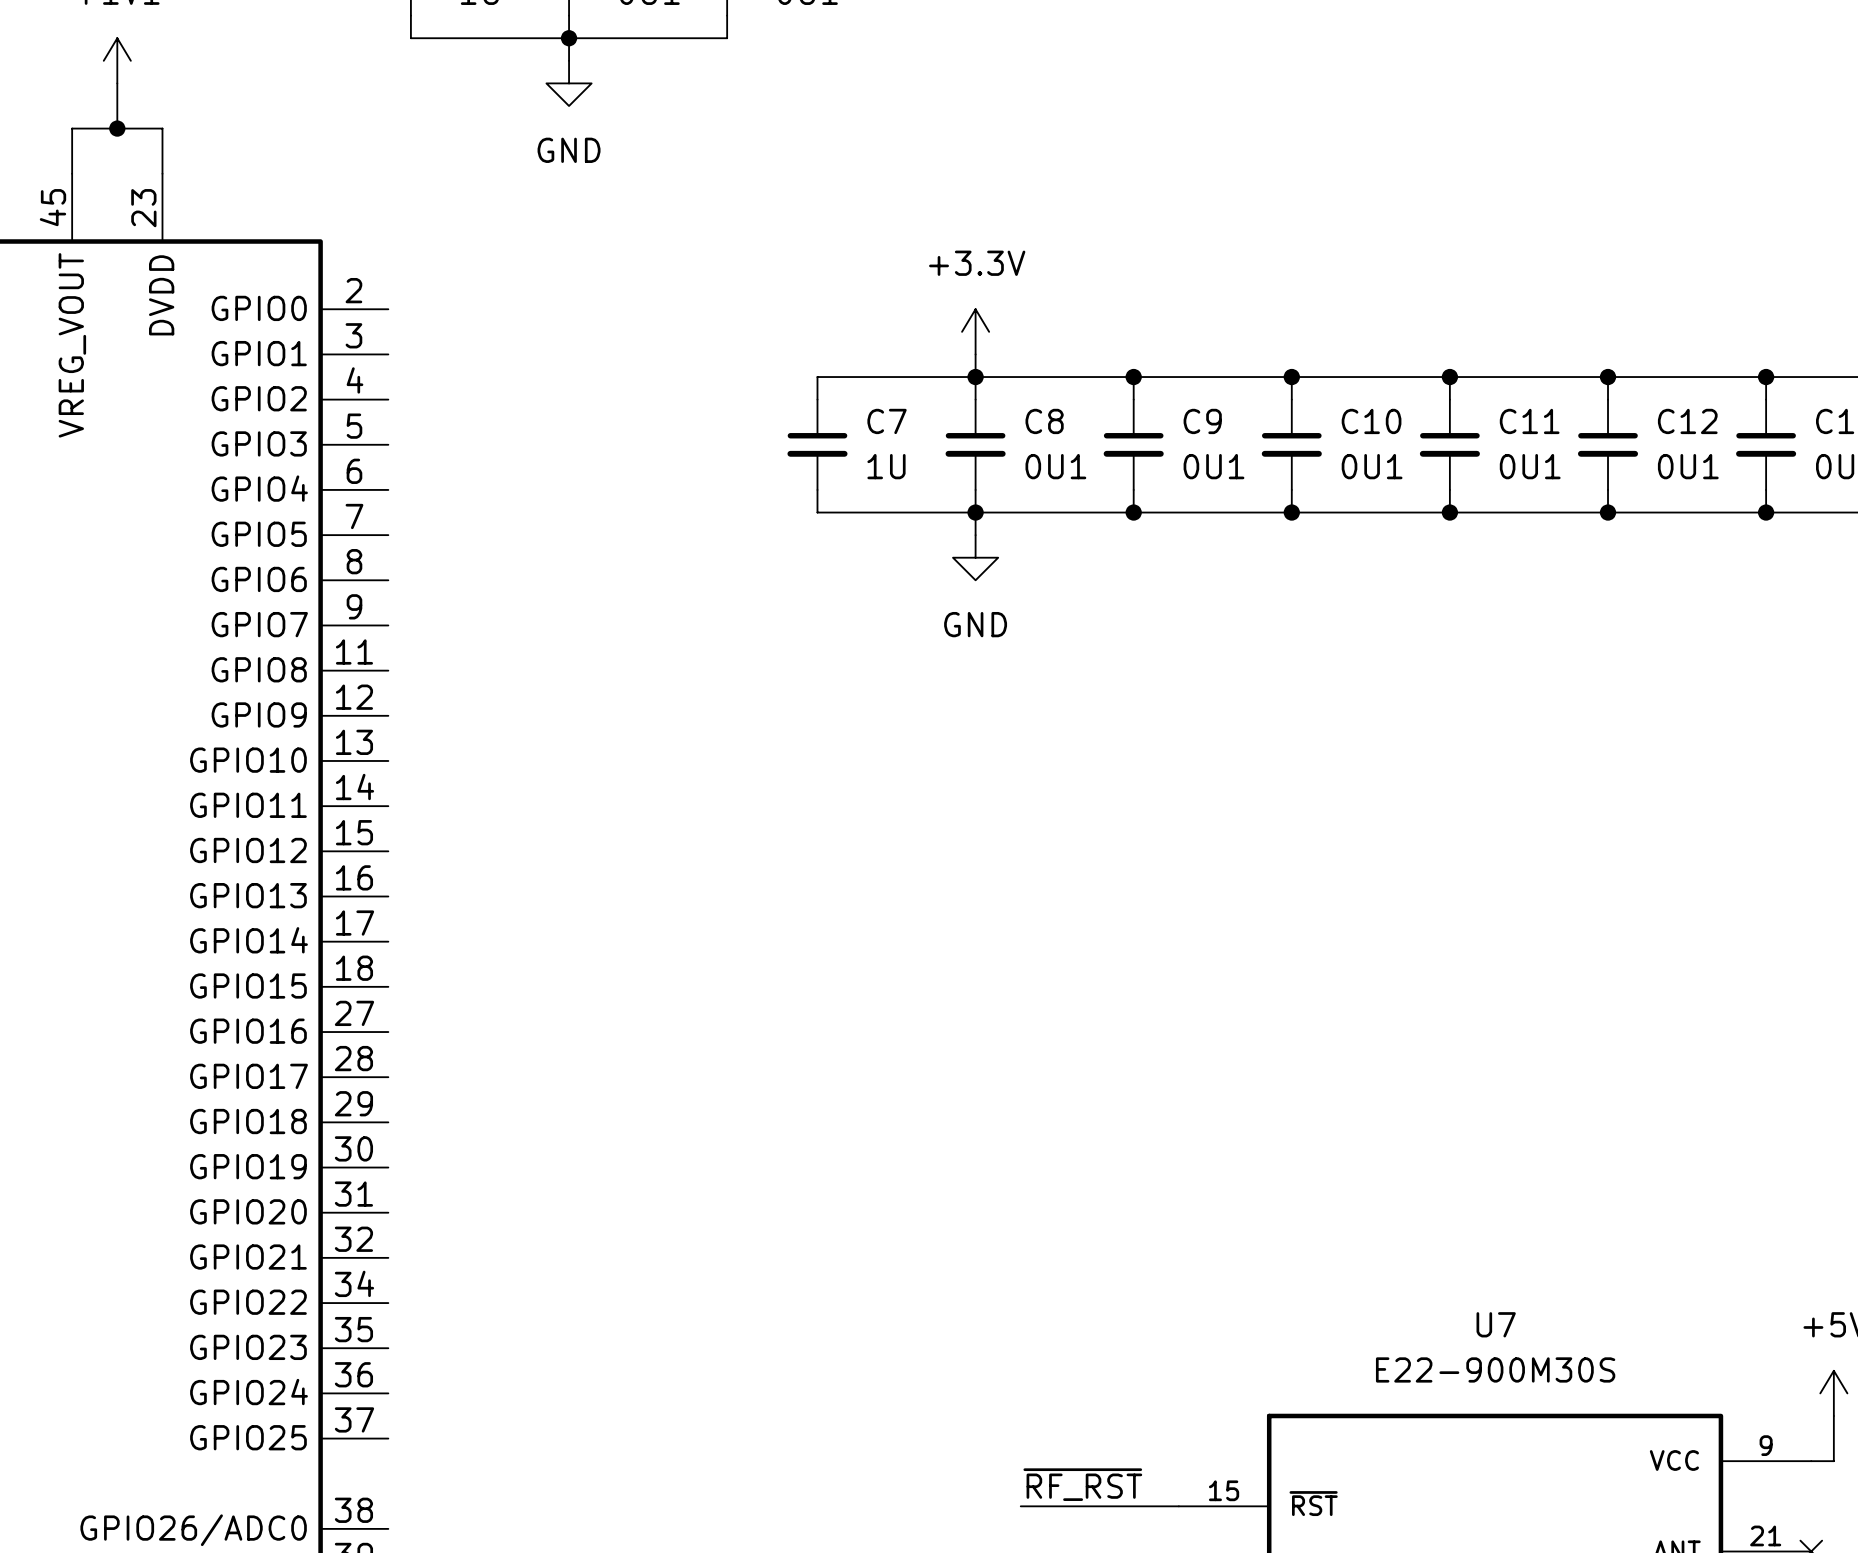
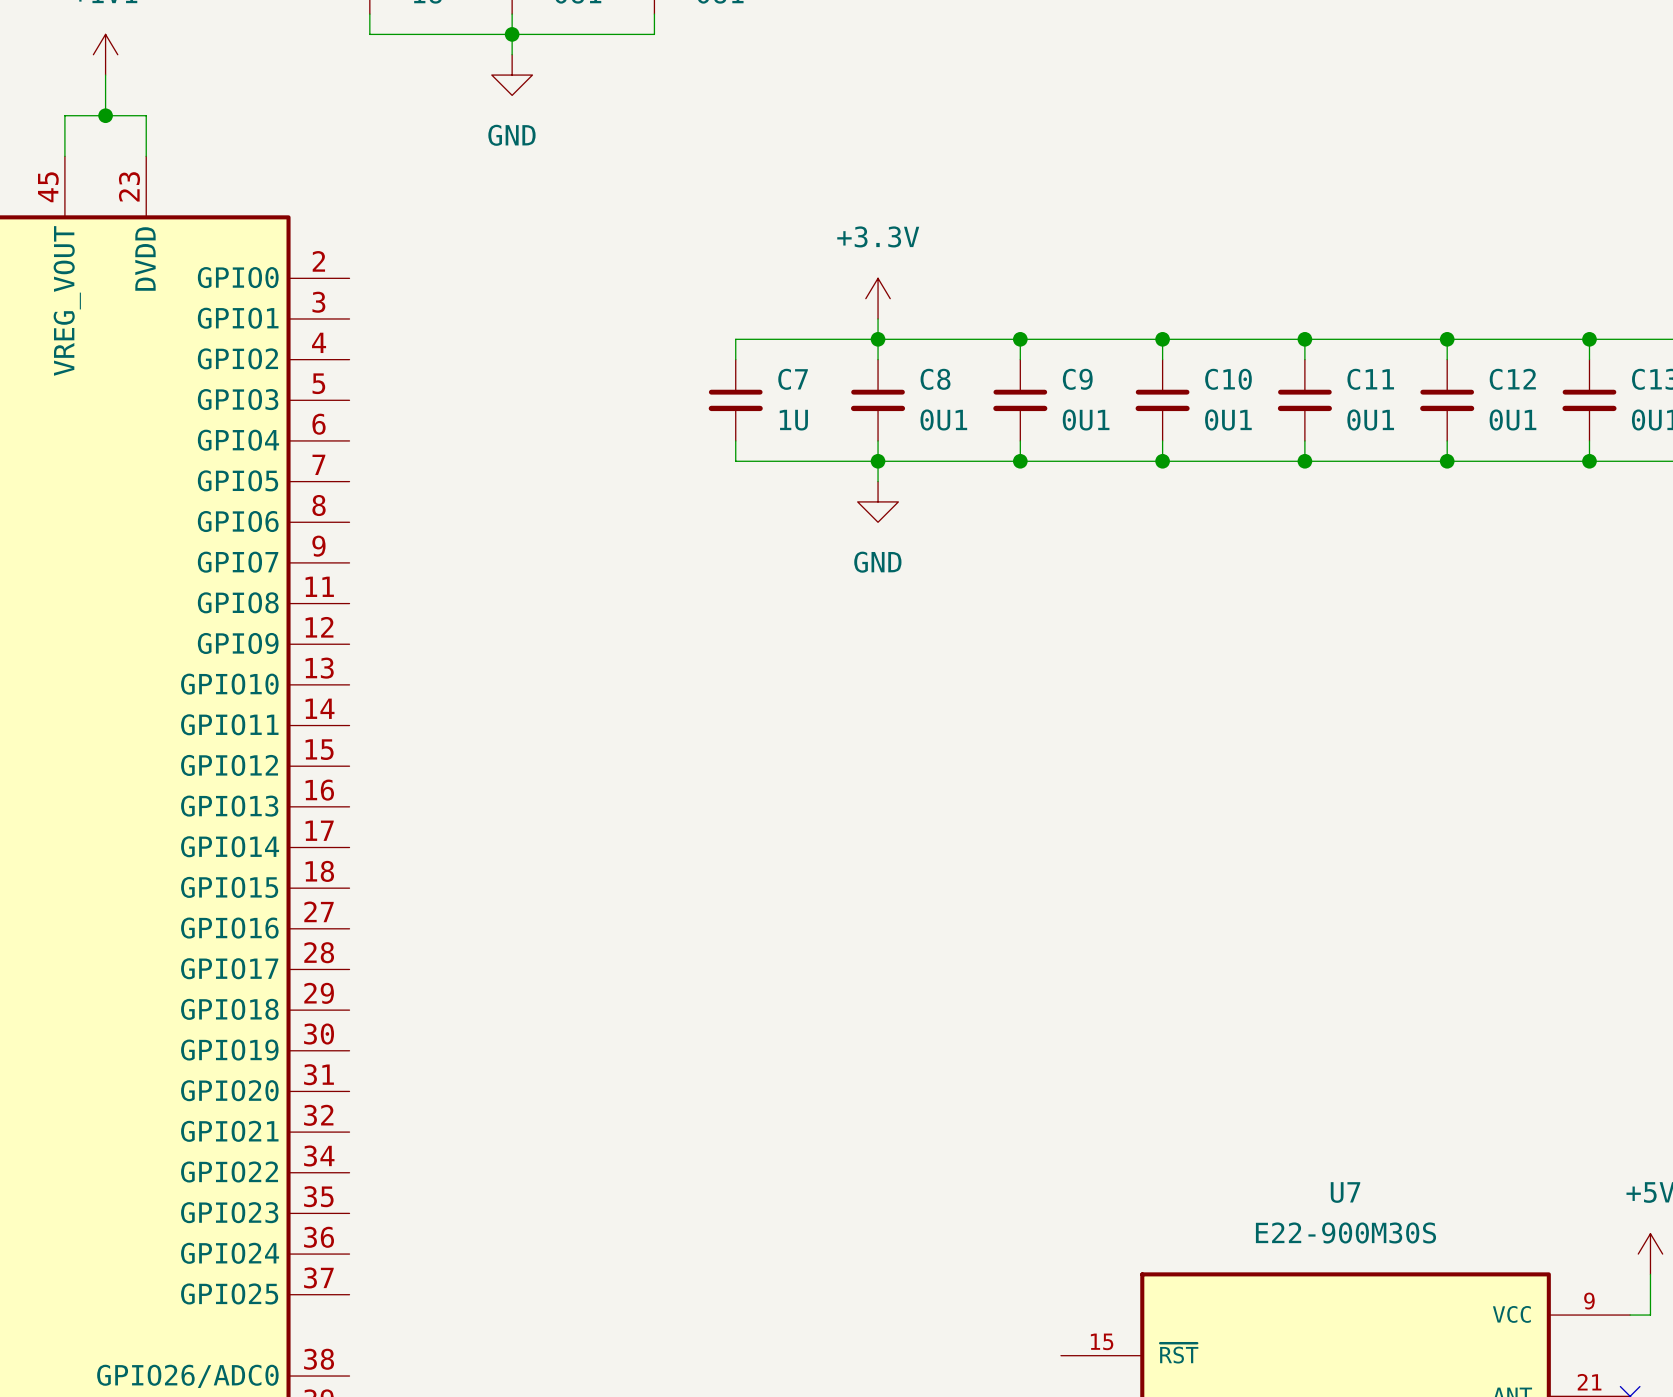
label: ~{RF_RST} (1082, 1484) -> none
wire: (1020, 1506) (1178, 1506) -> none

